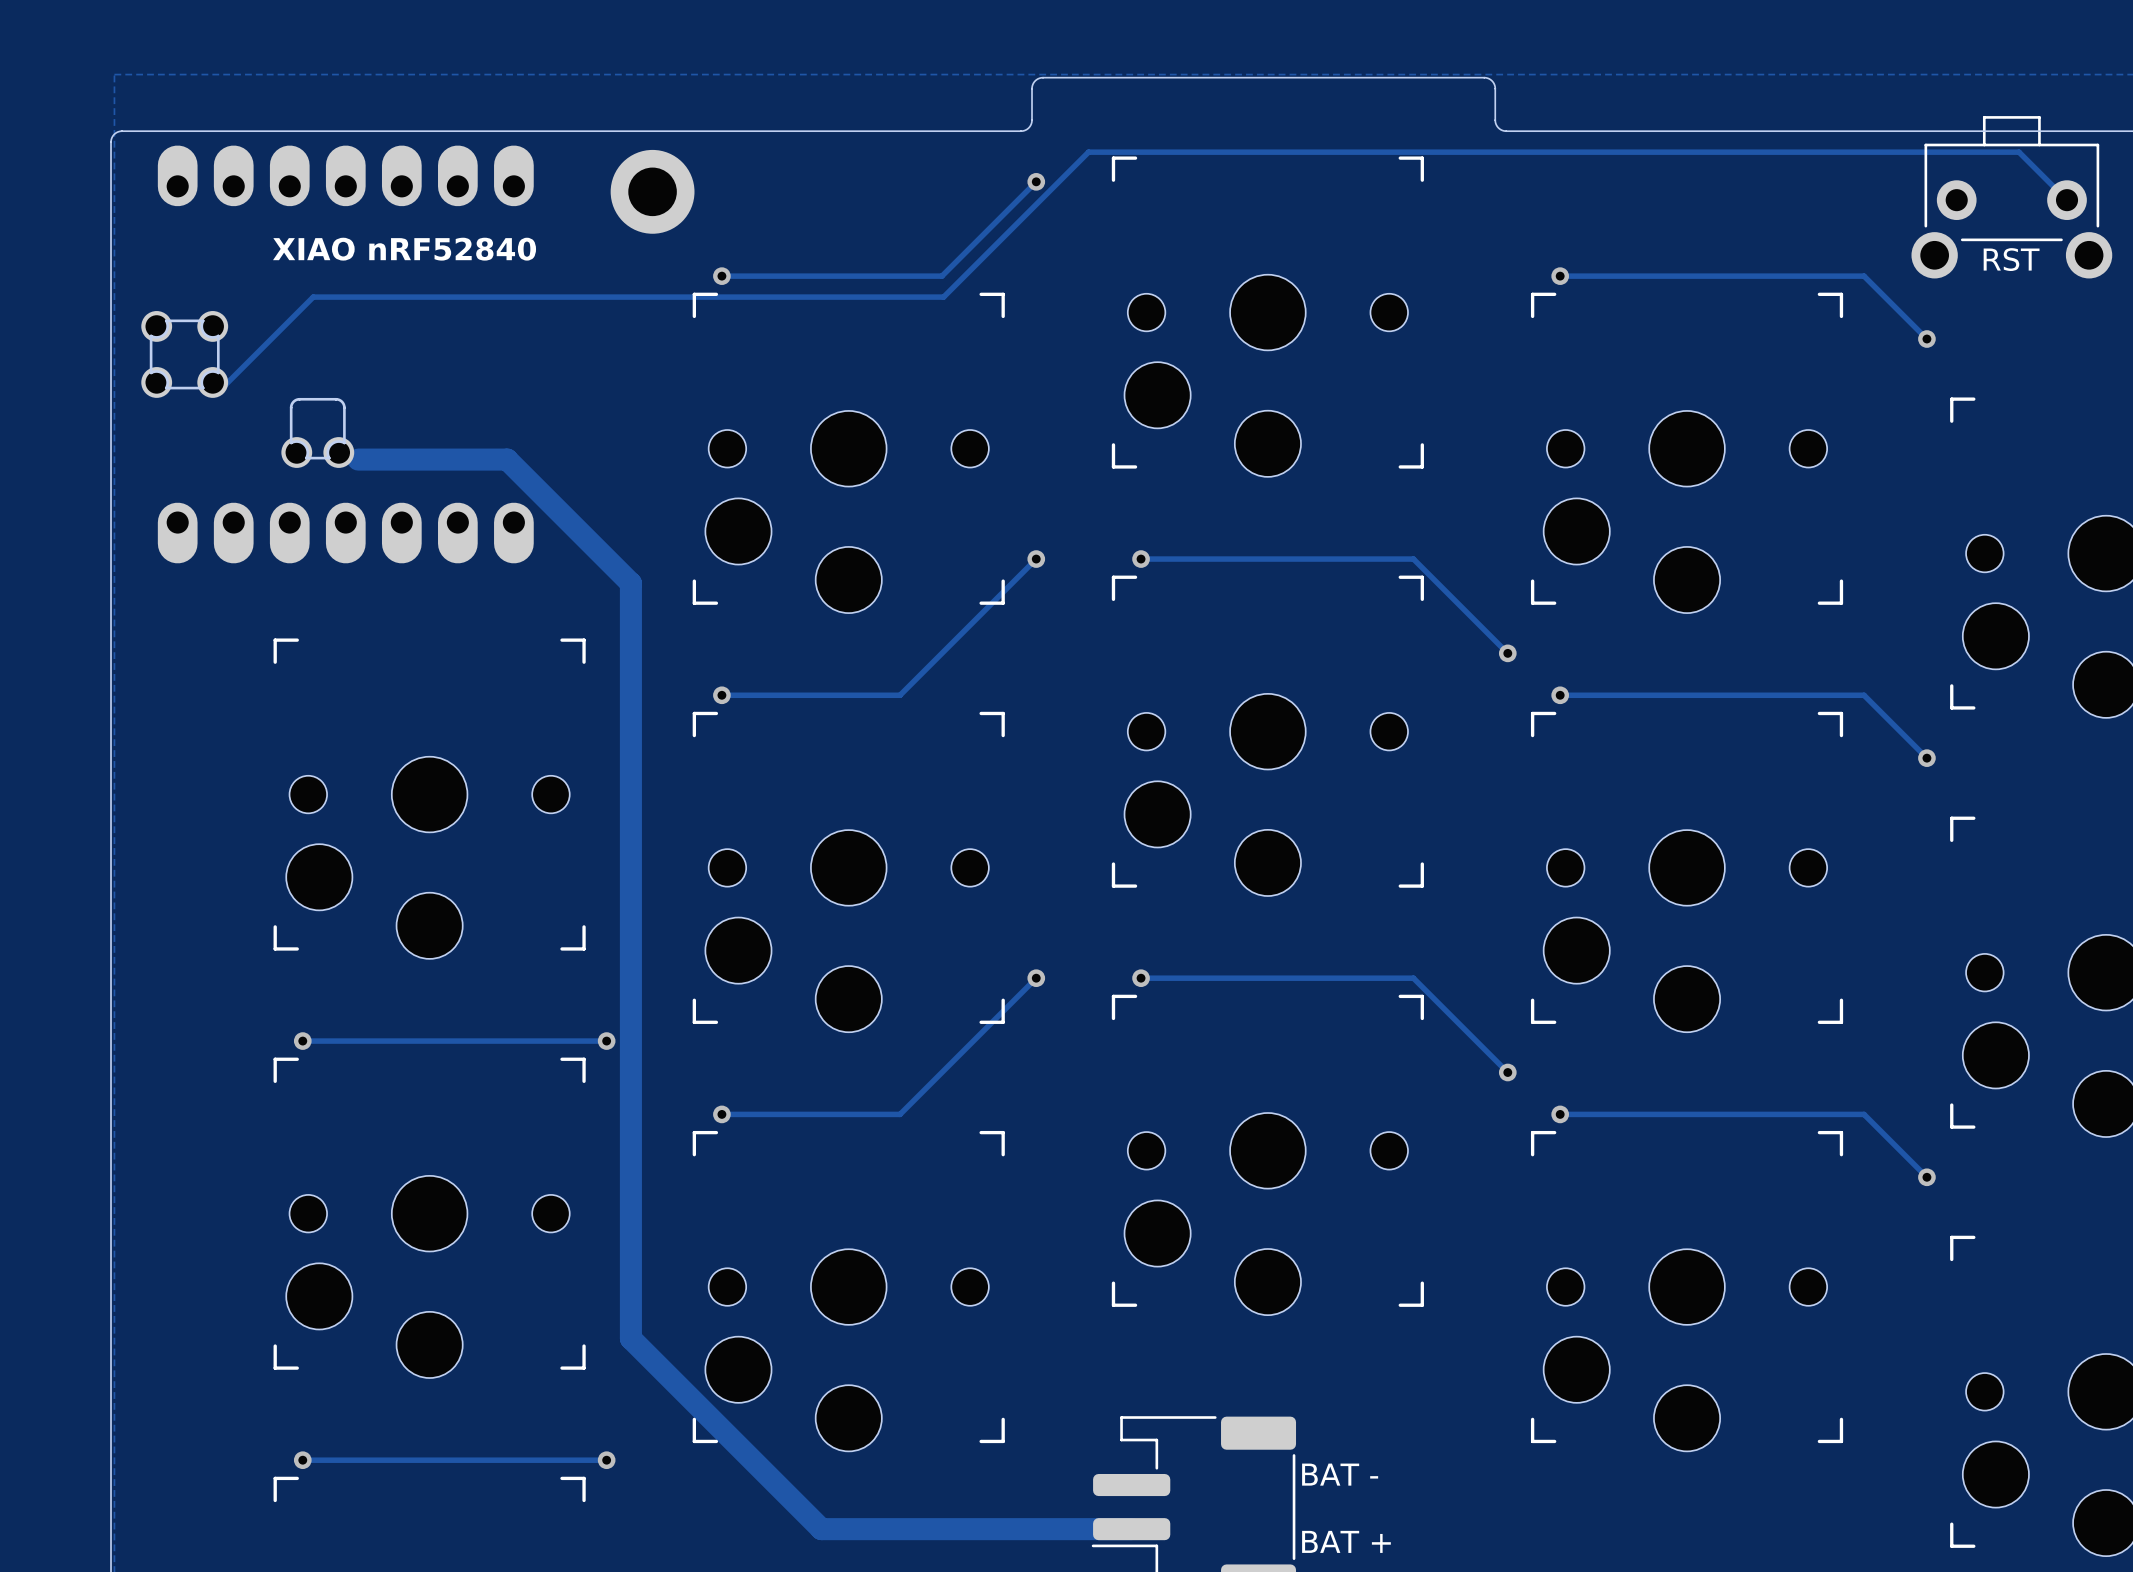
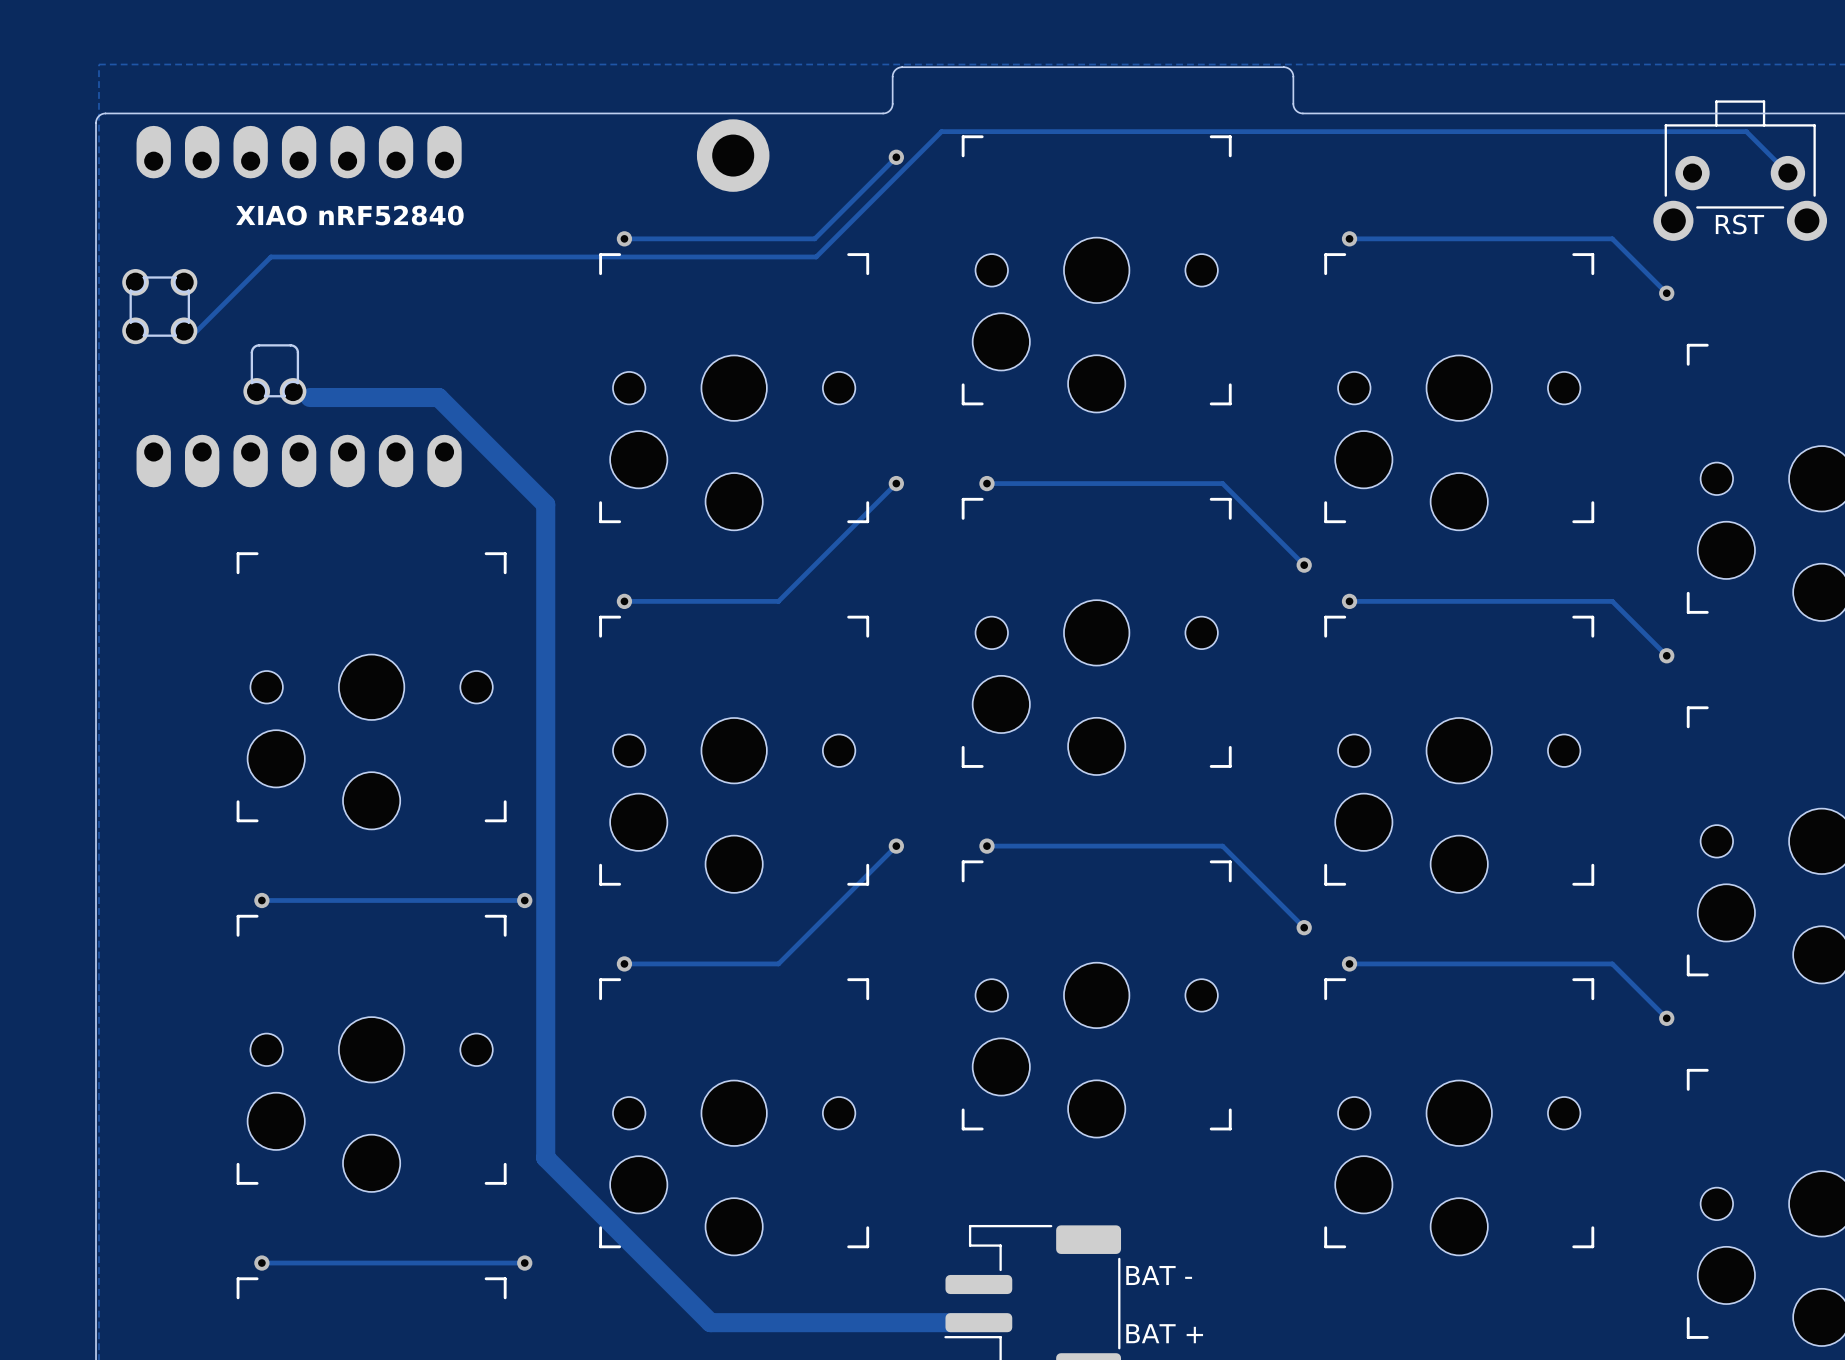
part position: (652, 191) -> (733, 155)

